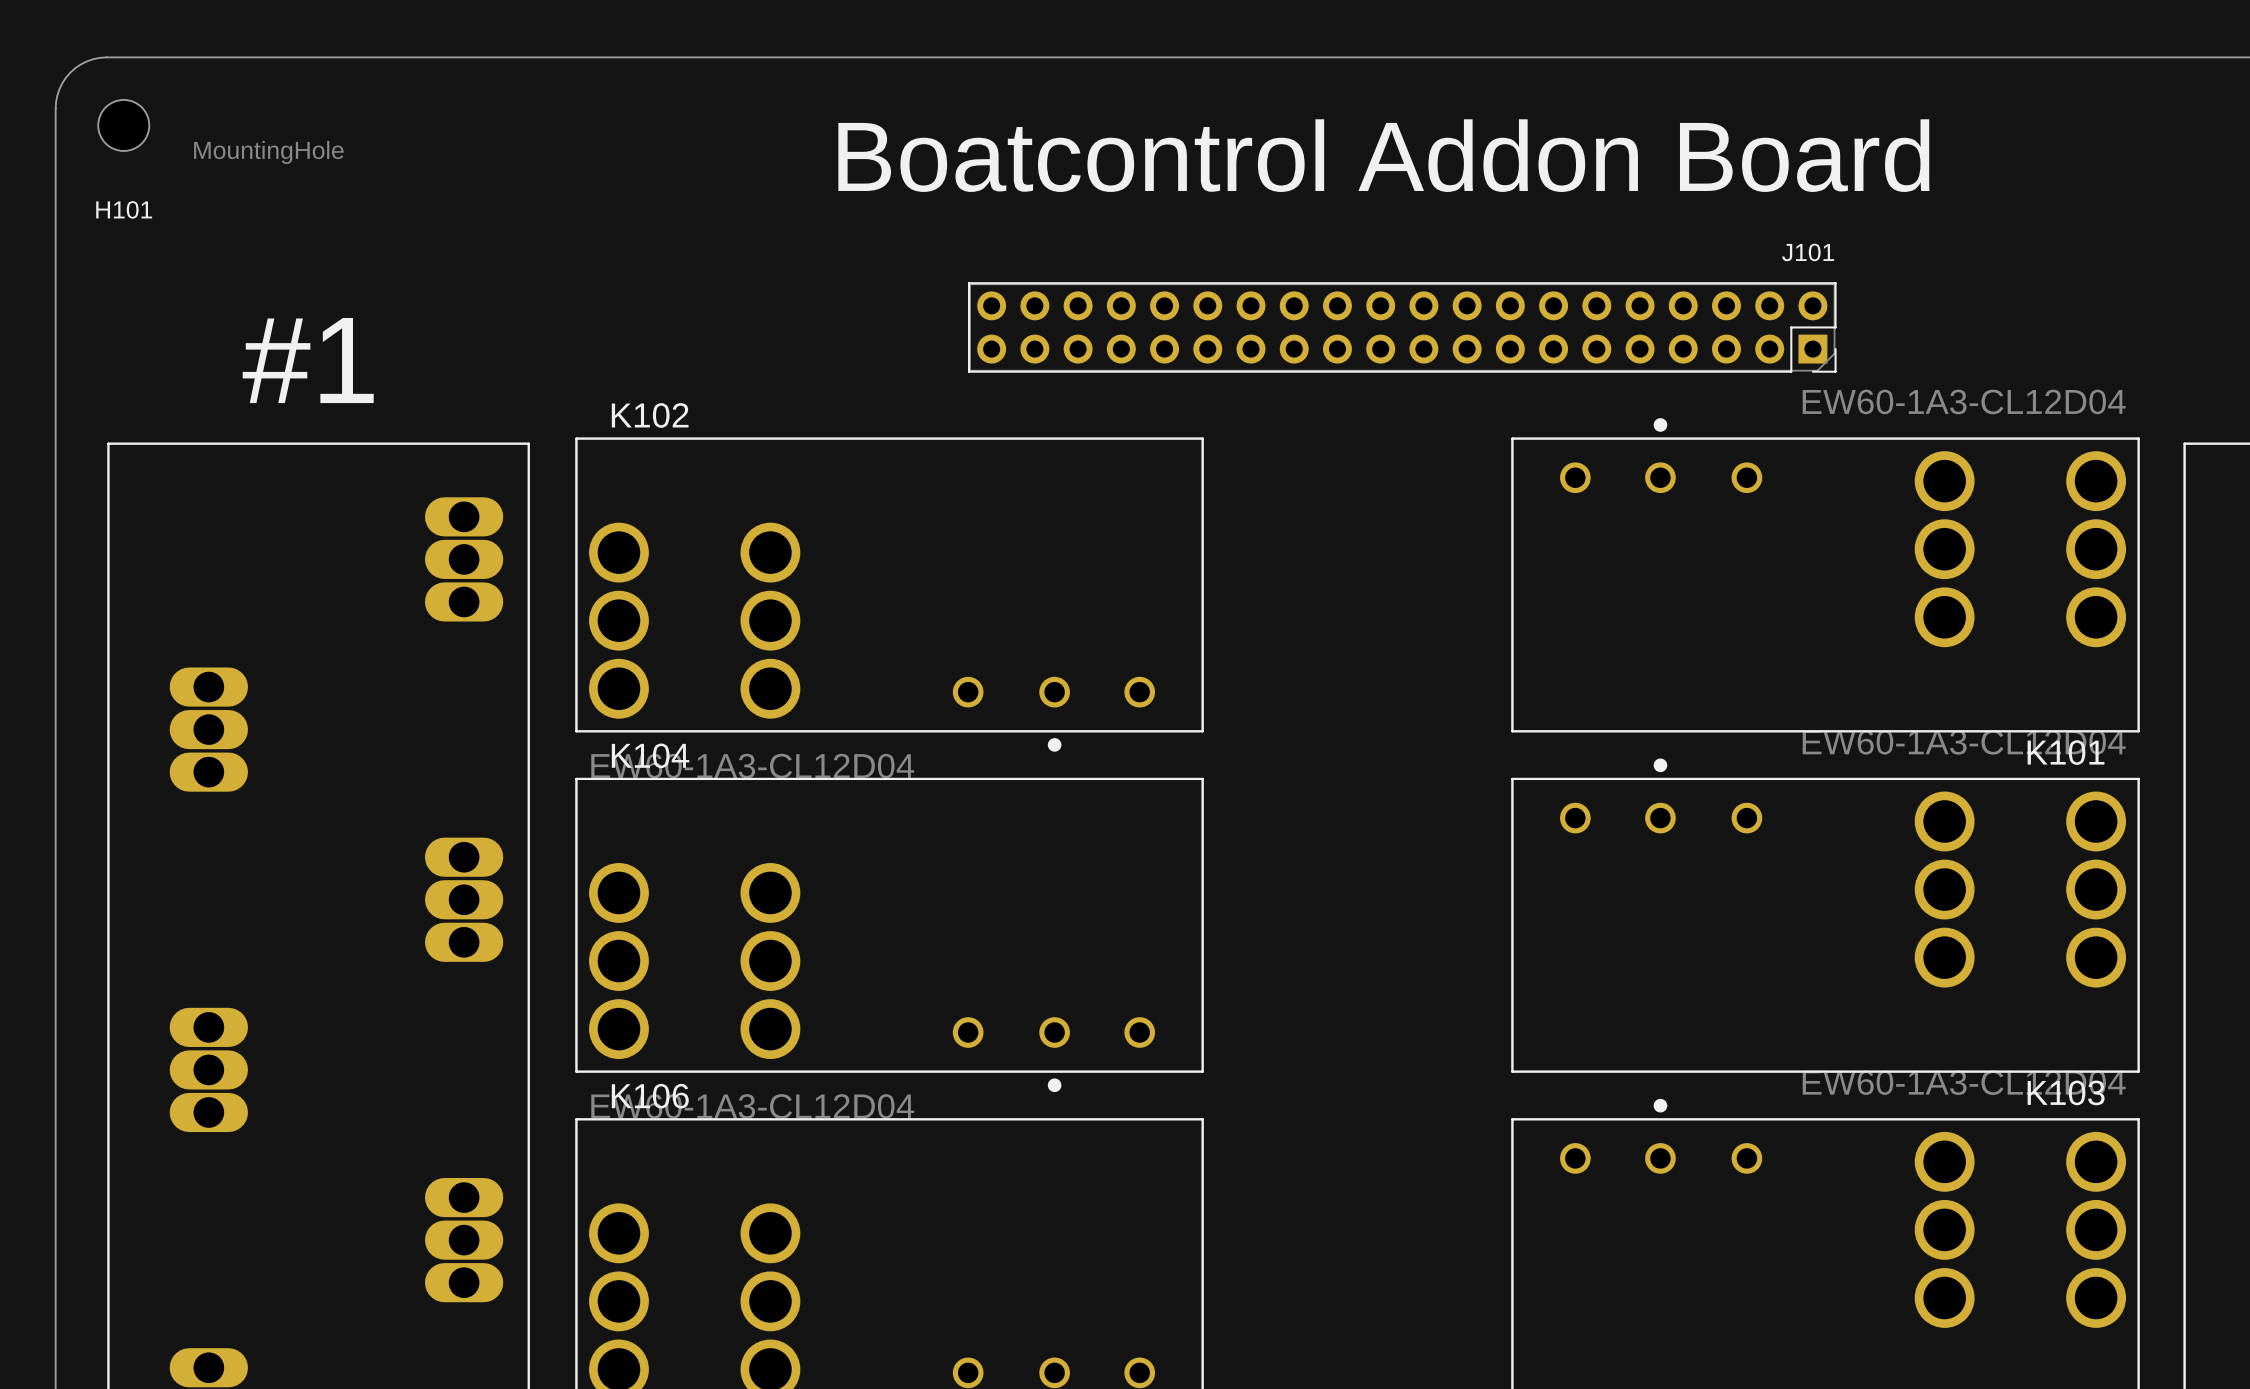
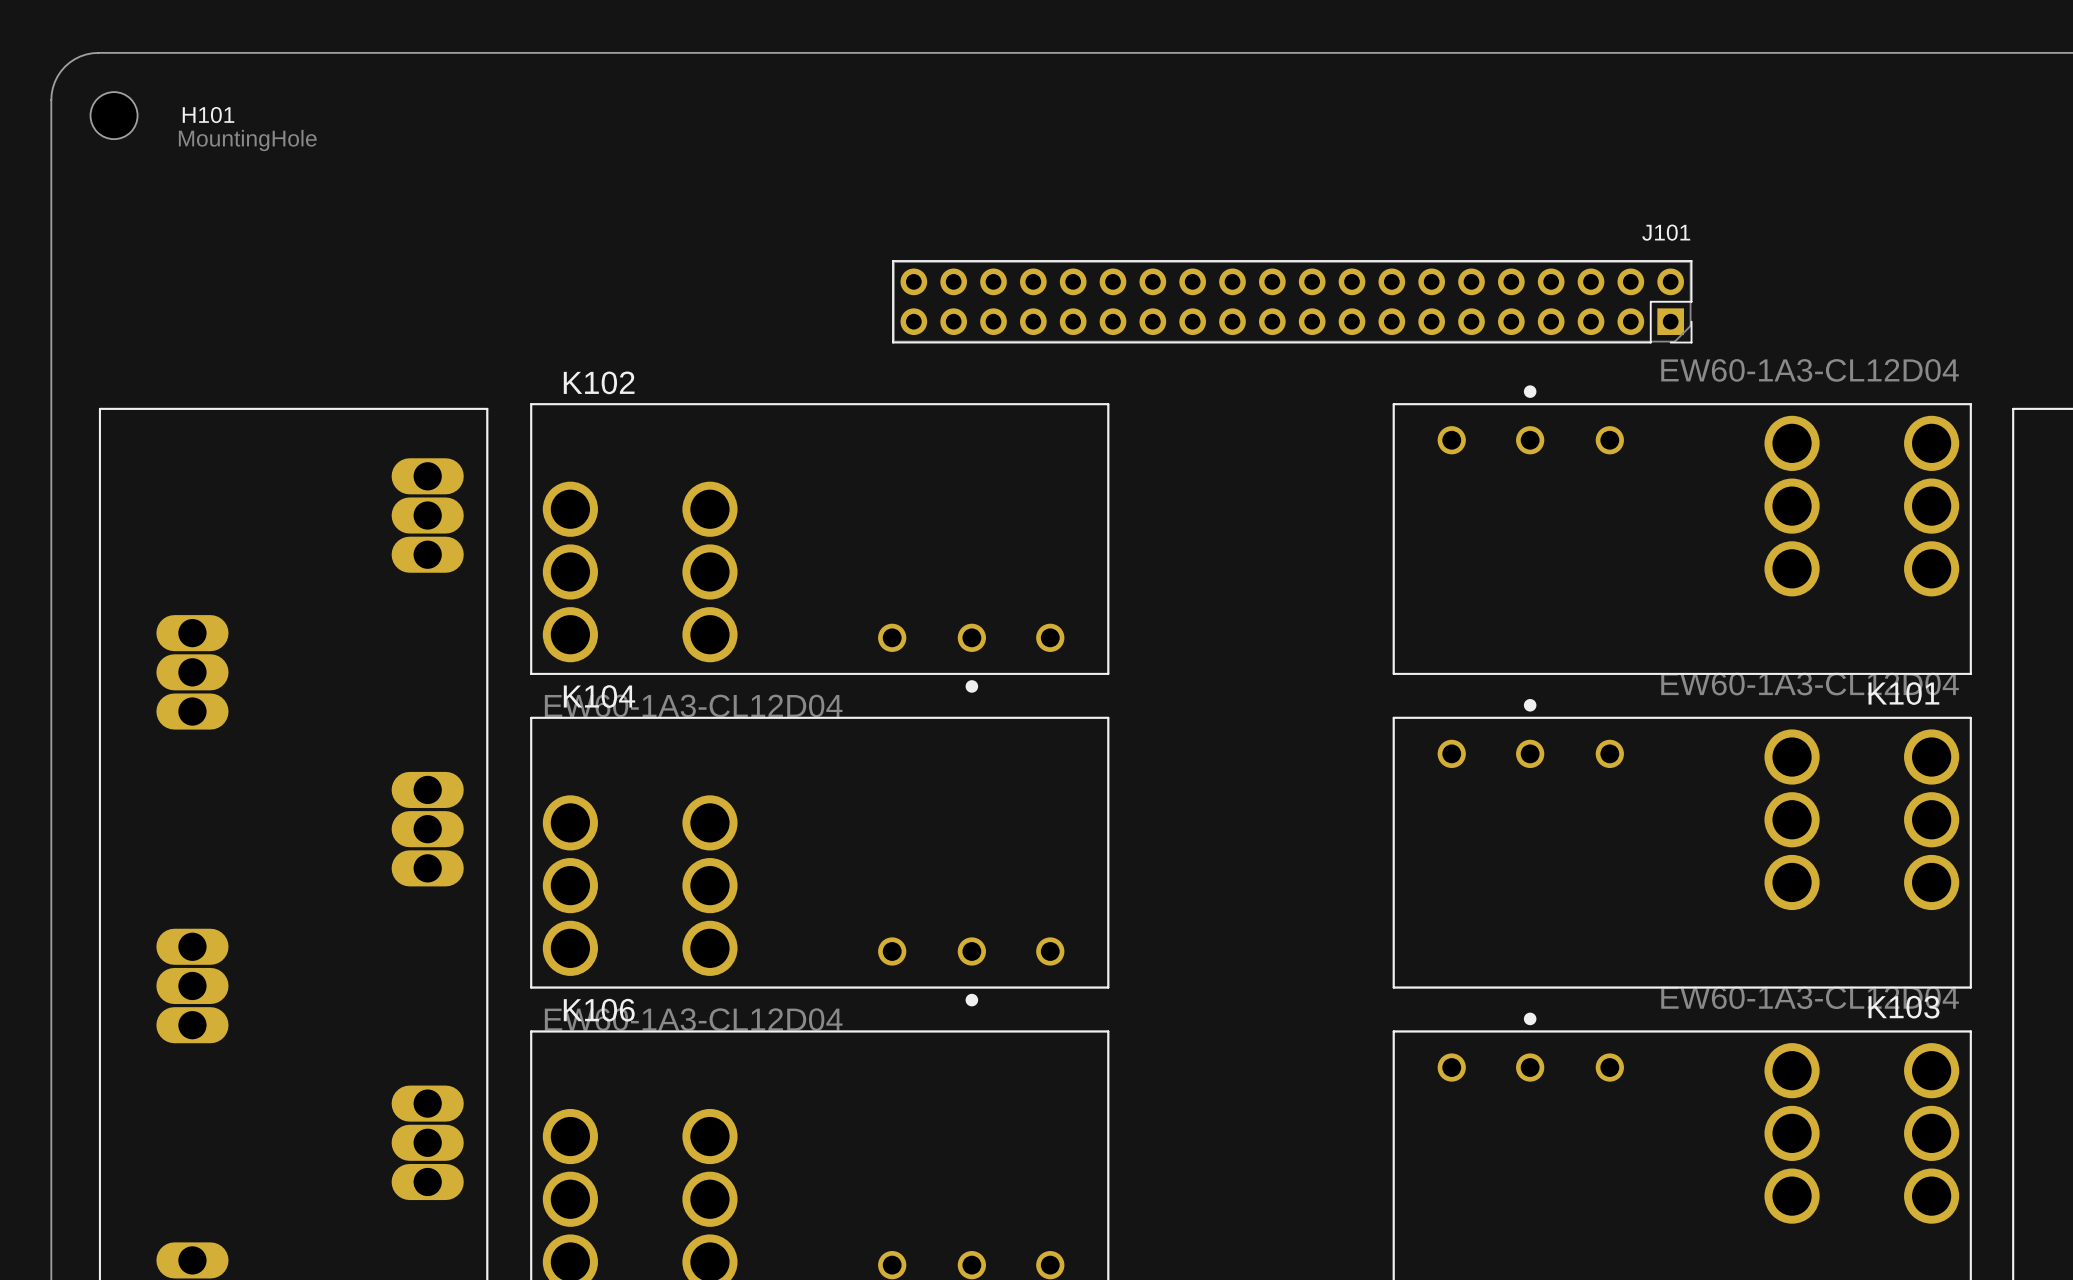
text: Boatcontrol Addon Board (1383, 155) -> none
H101 name position: H101 (124, 209) -> H101 (208, 115)
text: #1 (308, 360) -> none

